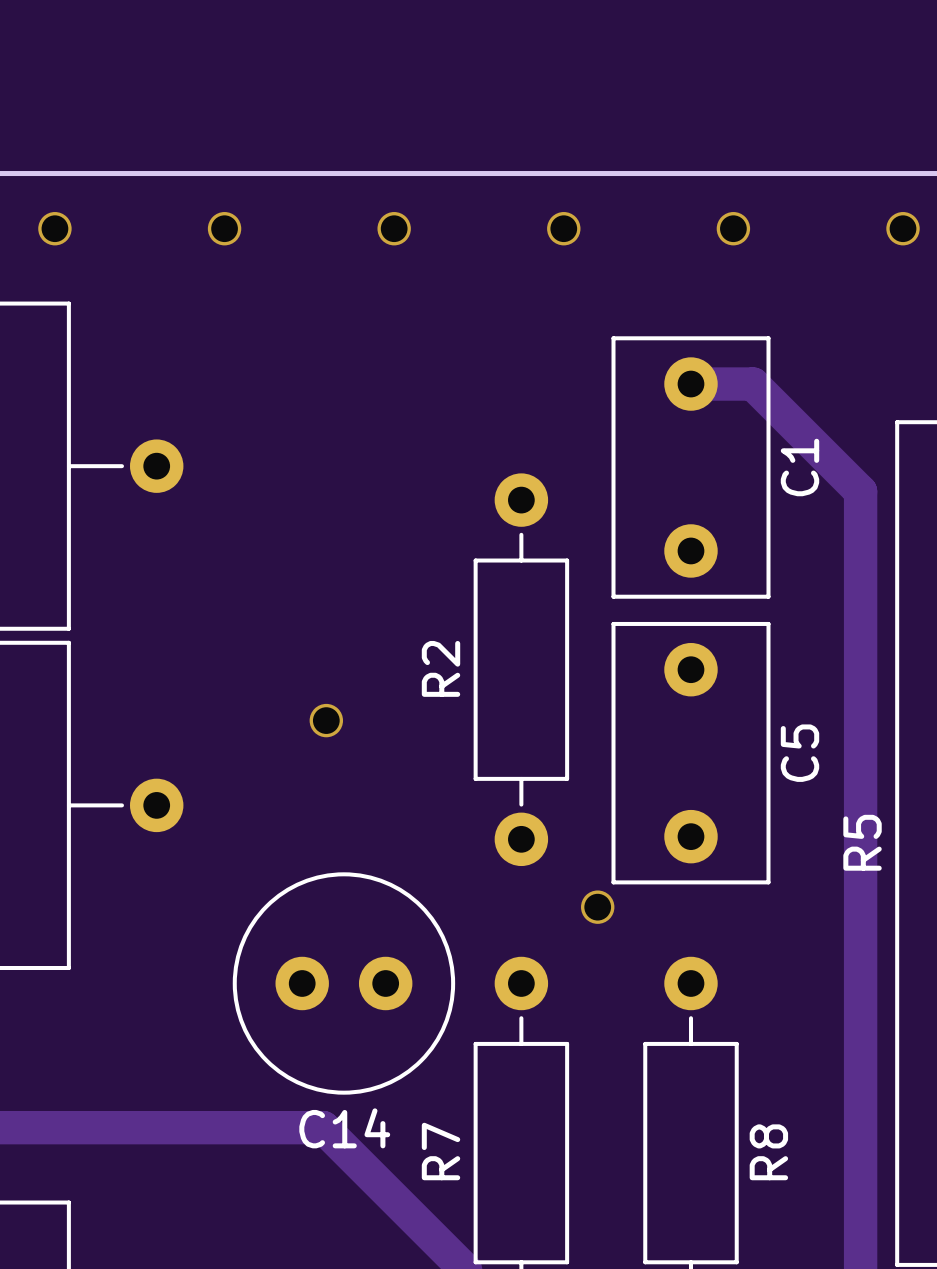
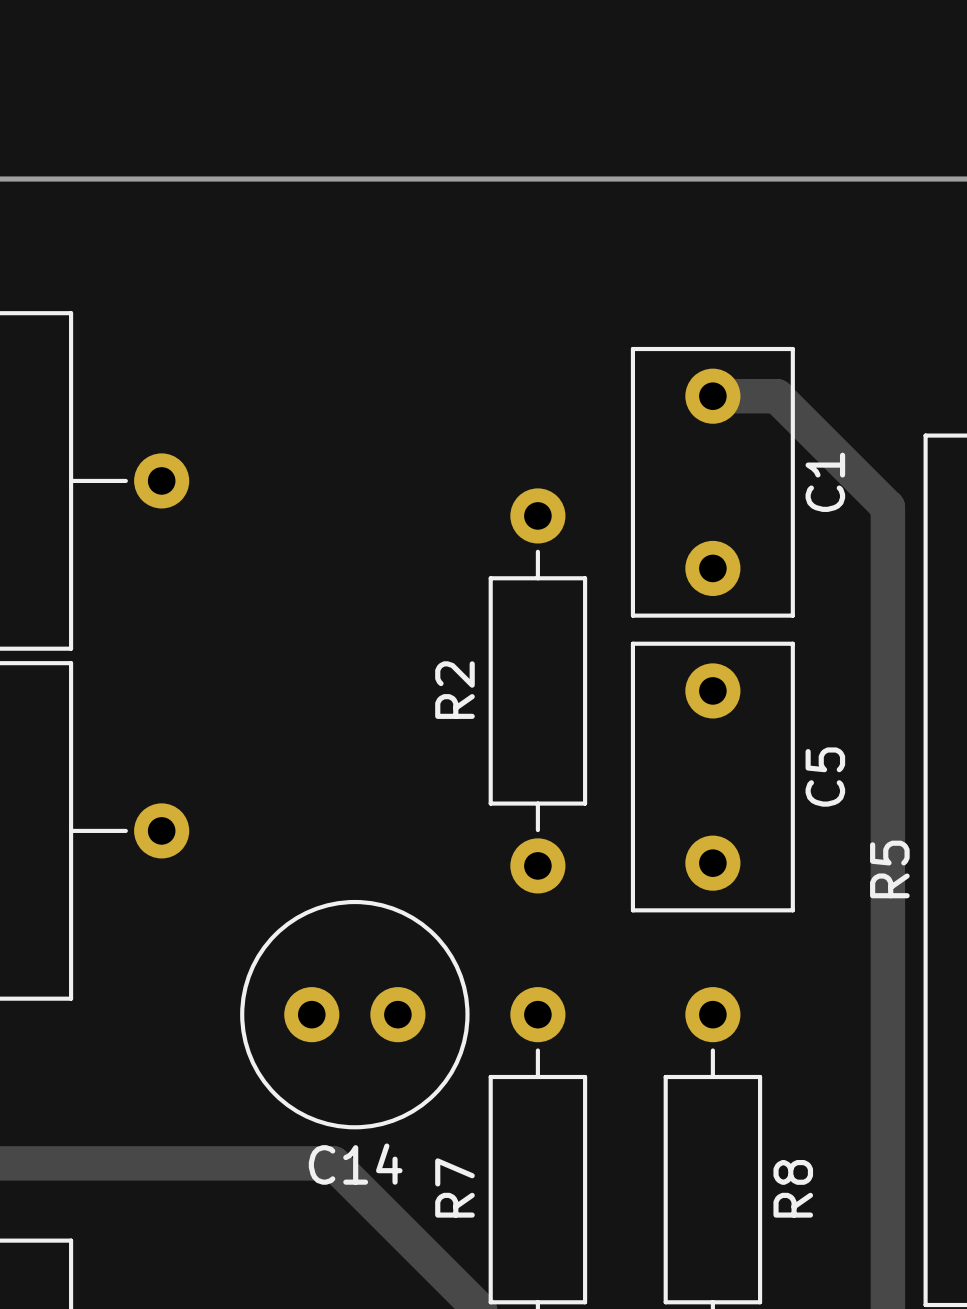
via: (54, 228) -> none
via: (224, 228) -> none
via: (394, 228) -> none
via: (563, 228) -> none
via: (733, 228) -> none
via: (903, 228) -> none
via: (326, 720) -> none
via: (597, 907) -> none

